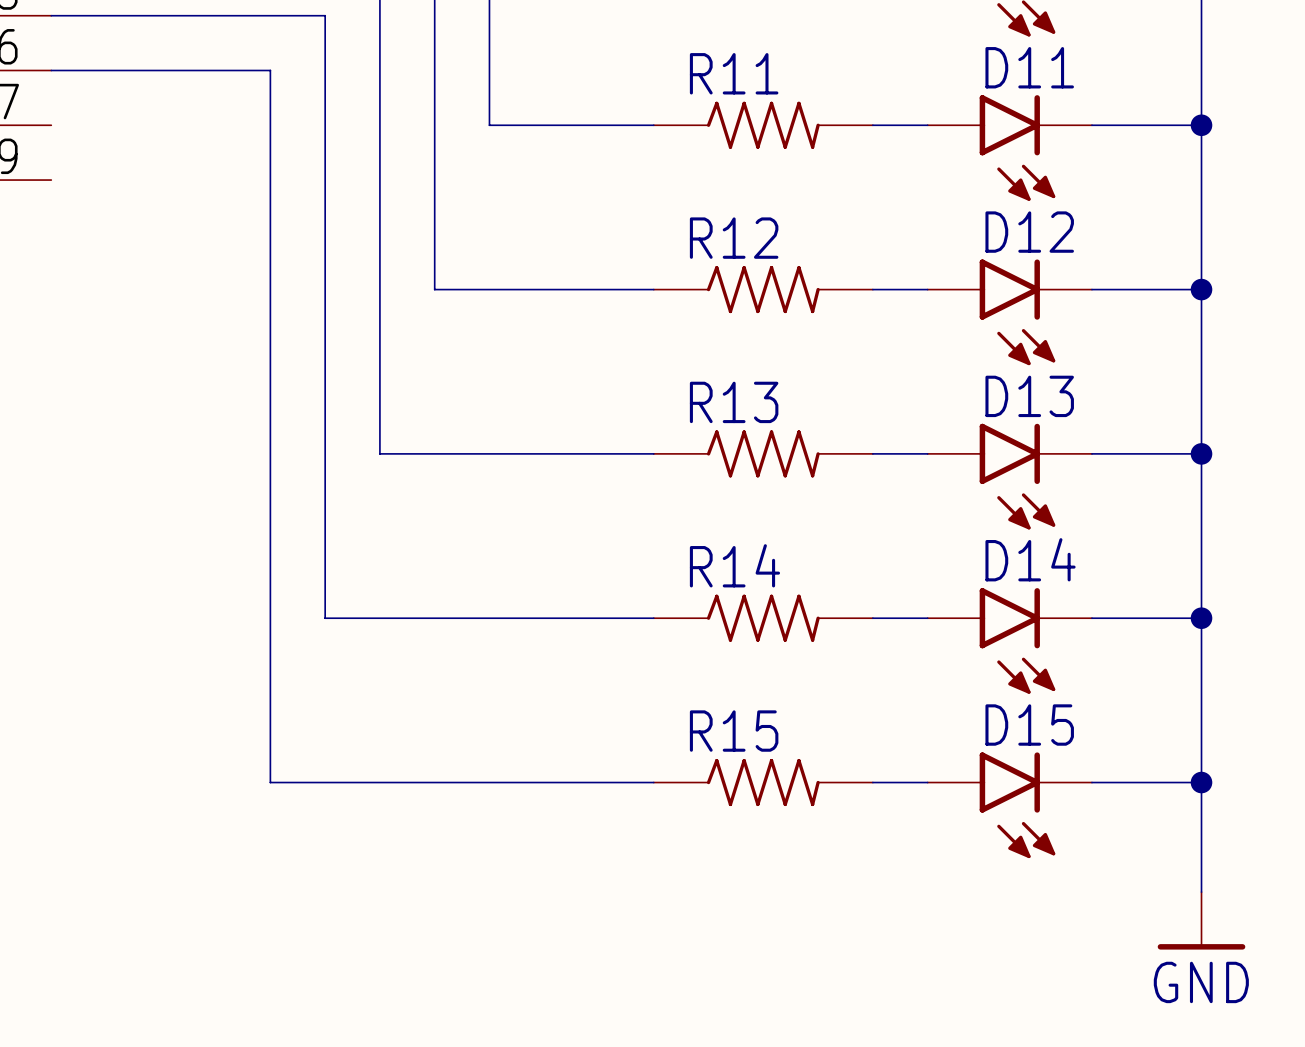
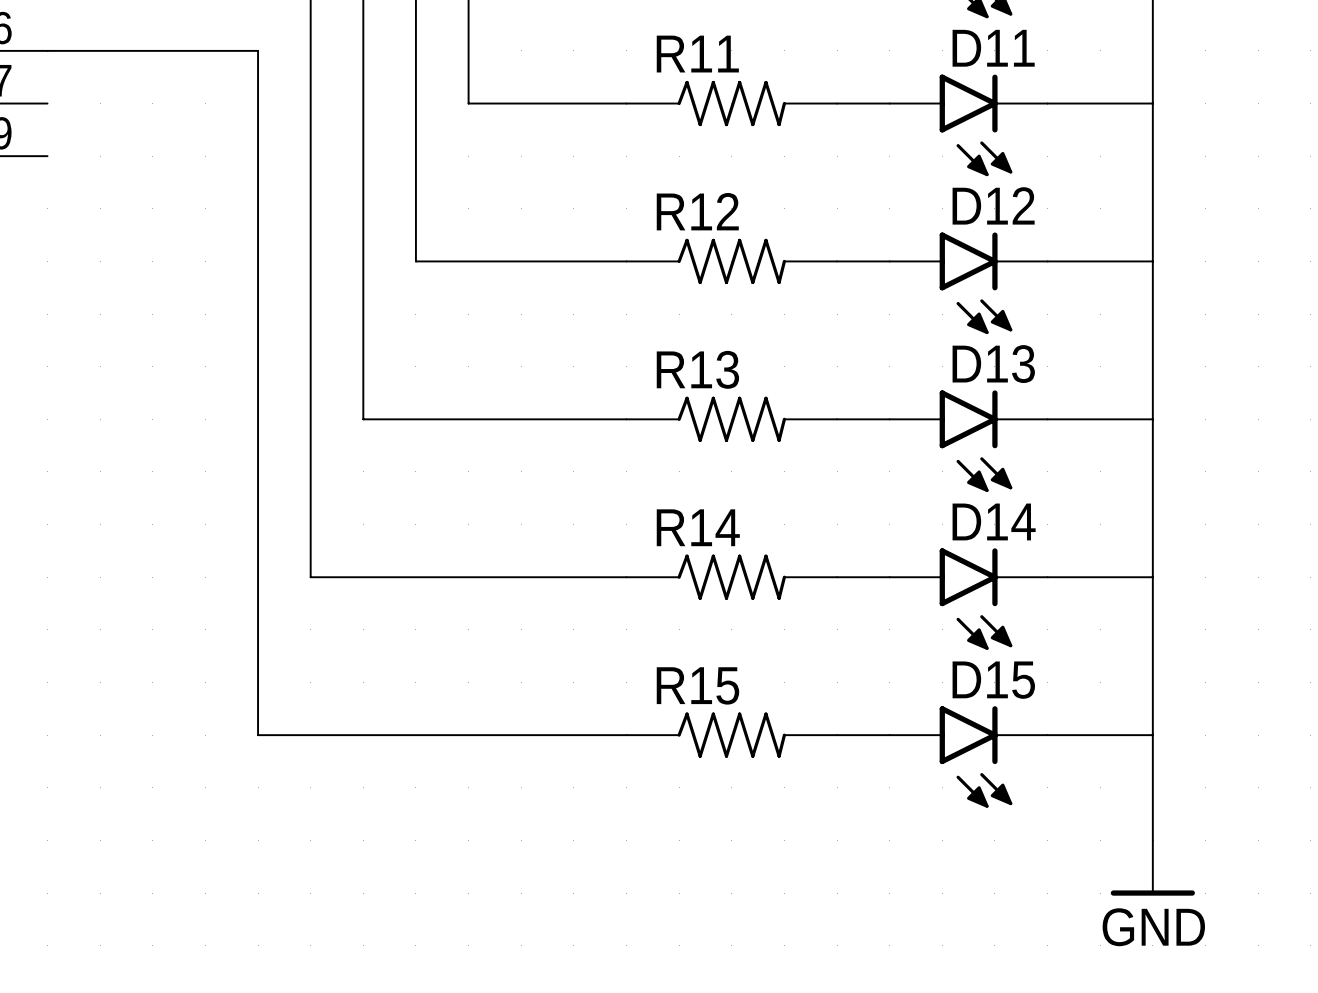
junction: (1201, 125) -> none
junction: (1201, 289) -> none
junction: (1201, 453) -> none
junction: (1201, 618) -> none
junction: (1201, 782) -> none

